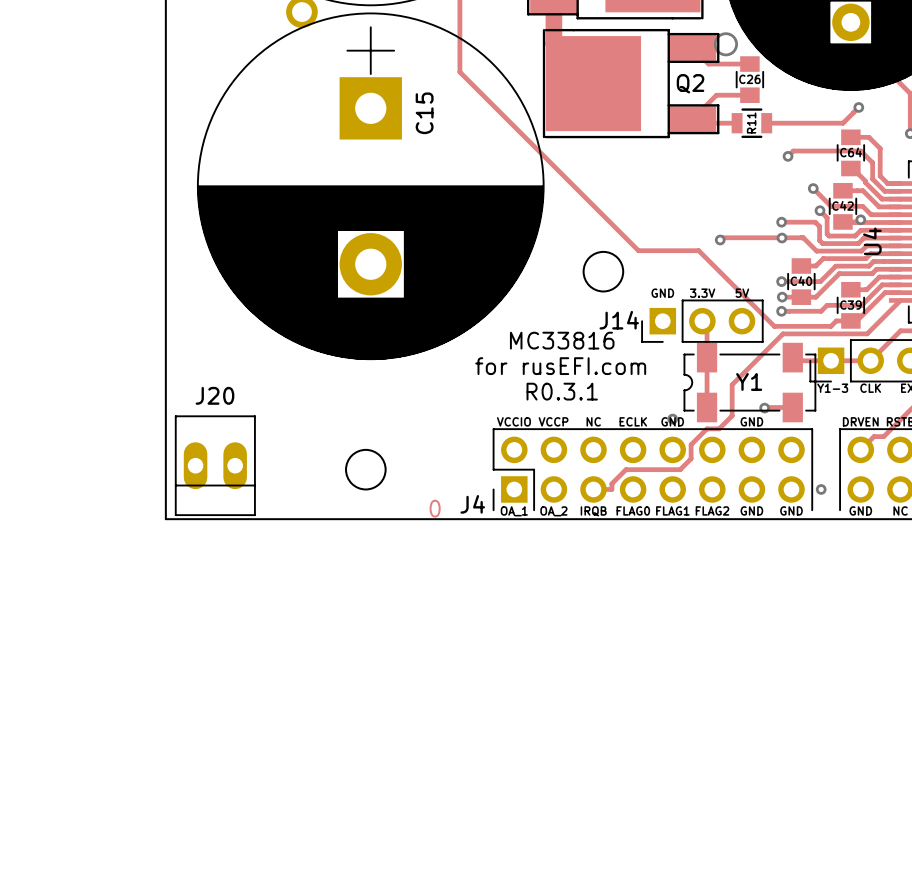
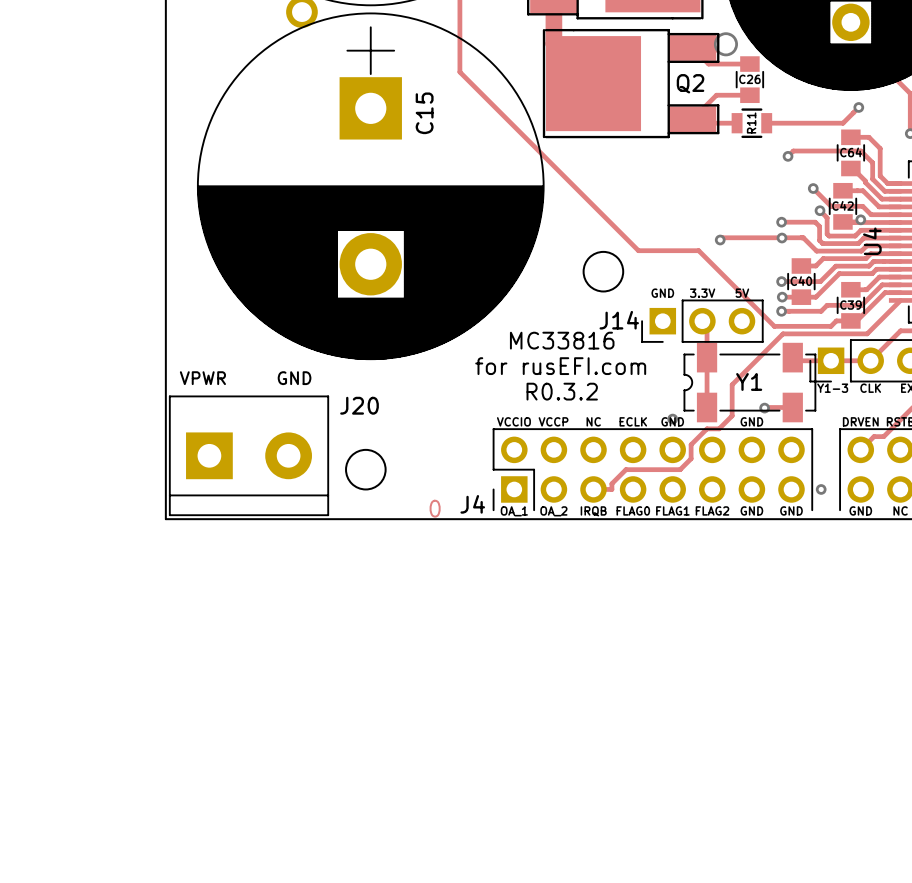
text: none -> VPWR (202, 378)
text: none -> GND (294, 378)
text: R0.3.1 (562, 391) -> R0.3.2 (562, 391)
J20 name position: J20 (214, 395) -> J20 (359, 405)
J20 footprint: [174, 415, 256, 517] -> [168, 395, 330, 517]

